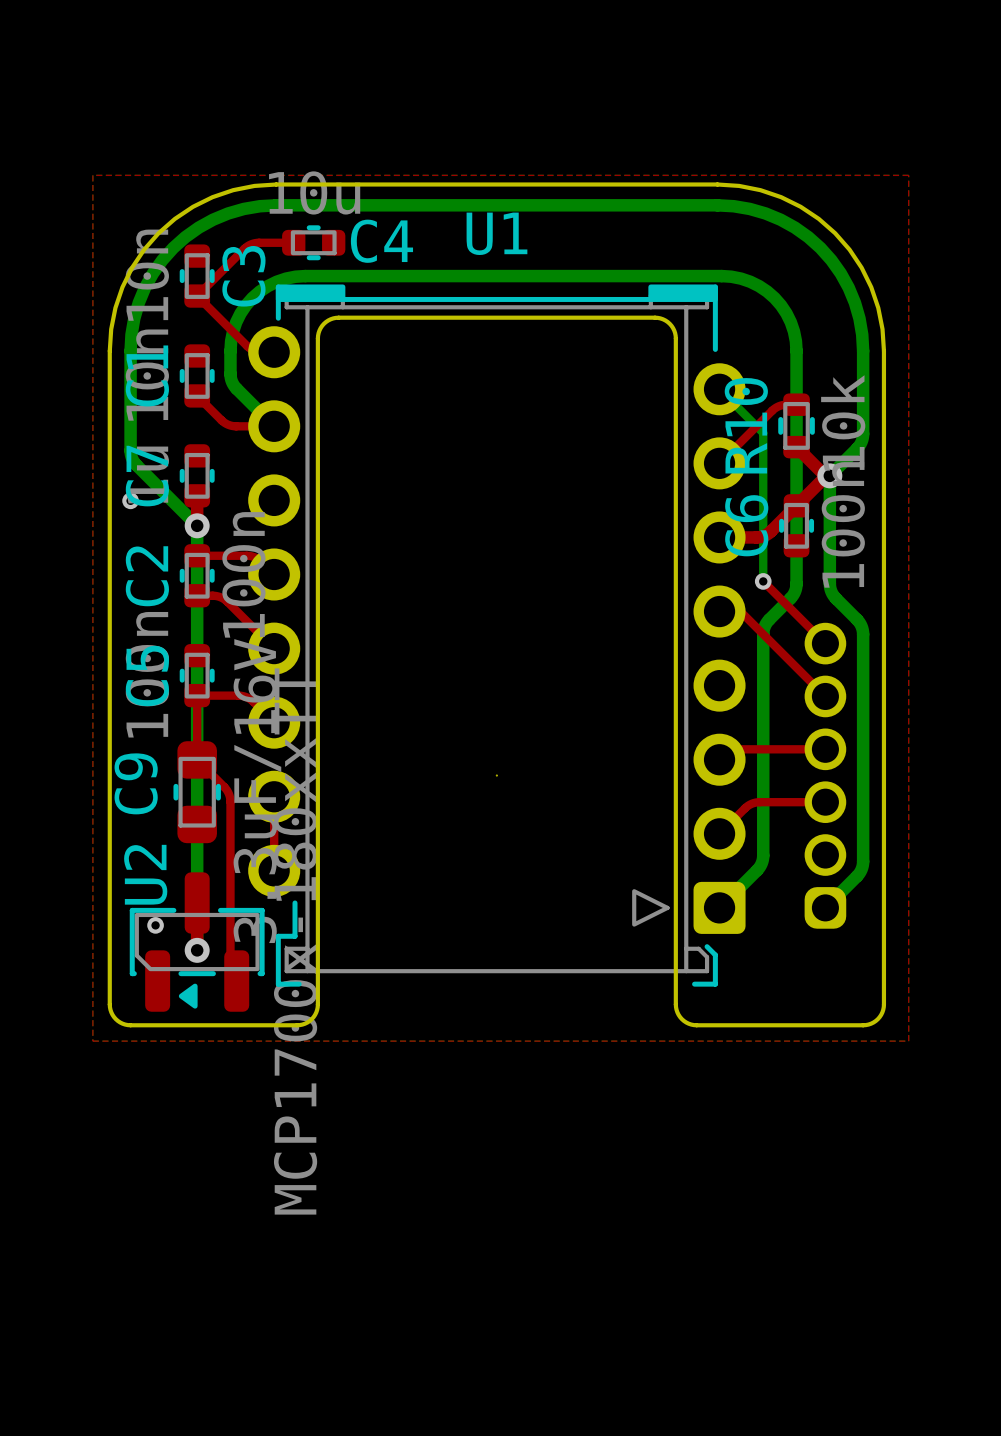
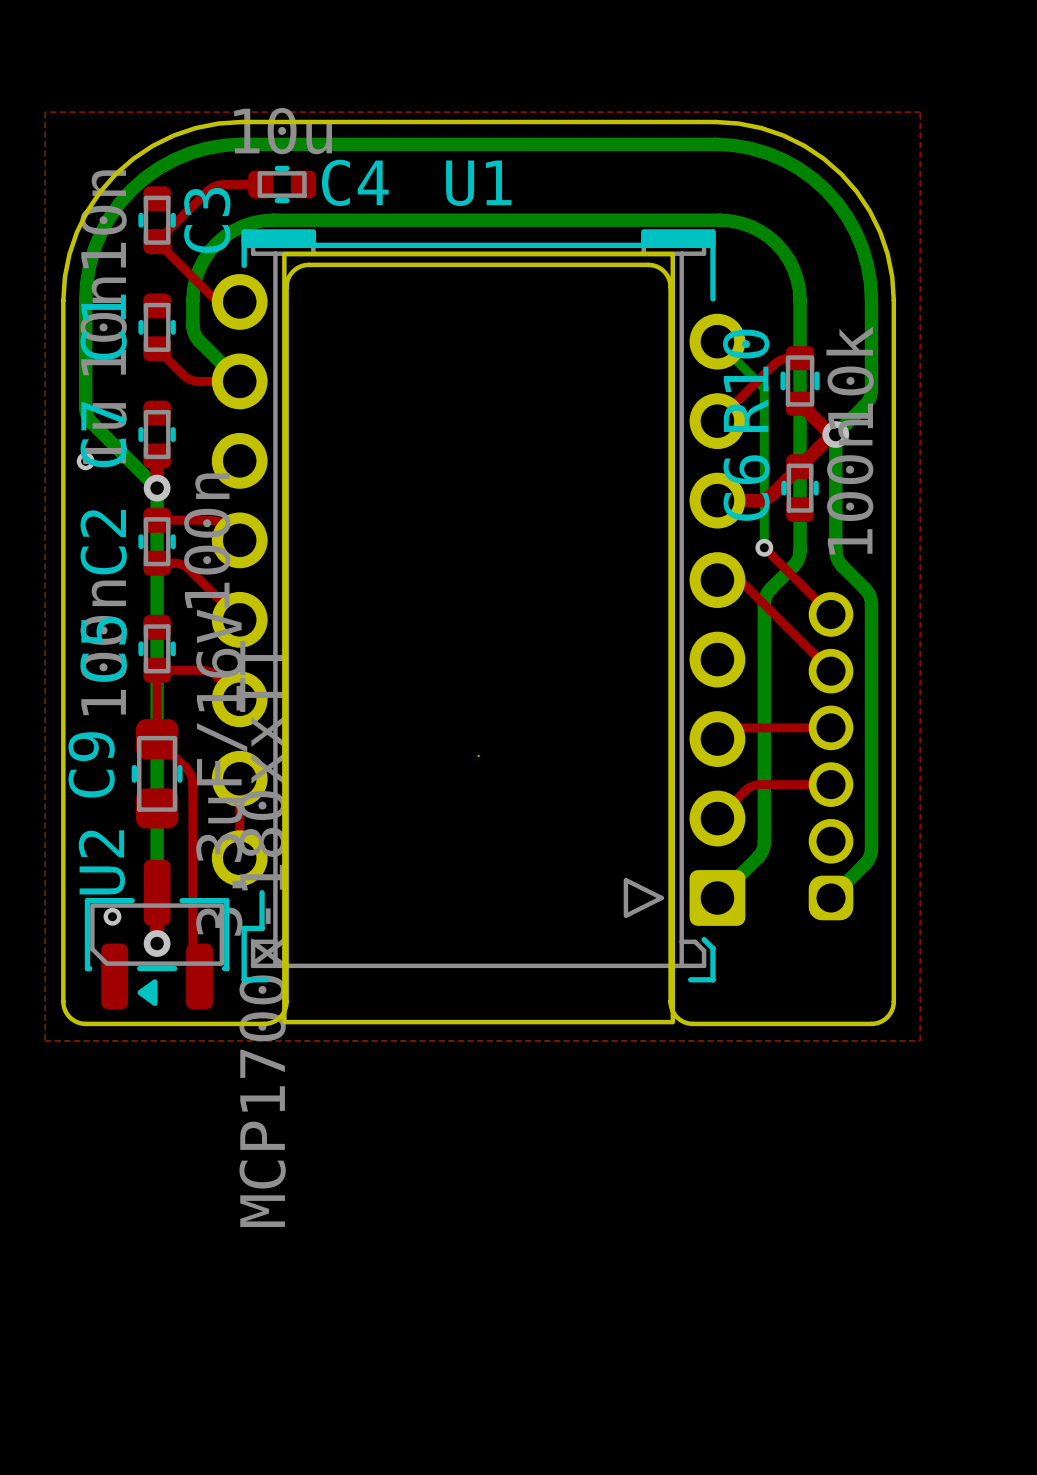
U1 footprint: [248, 284, 746, 987] -> [211, 229, 746, 1025]

